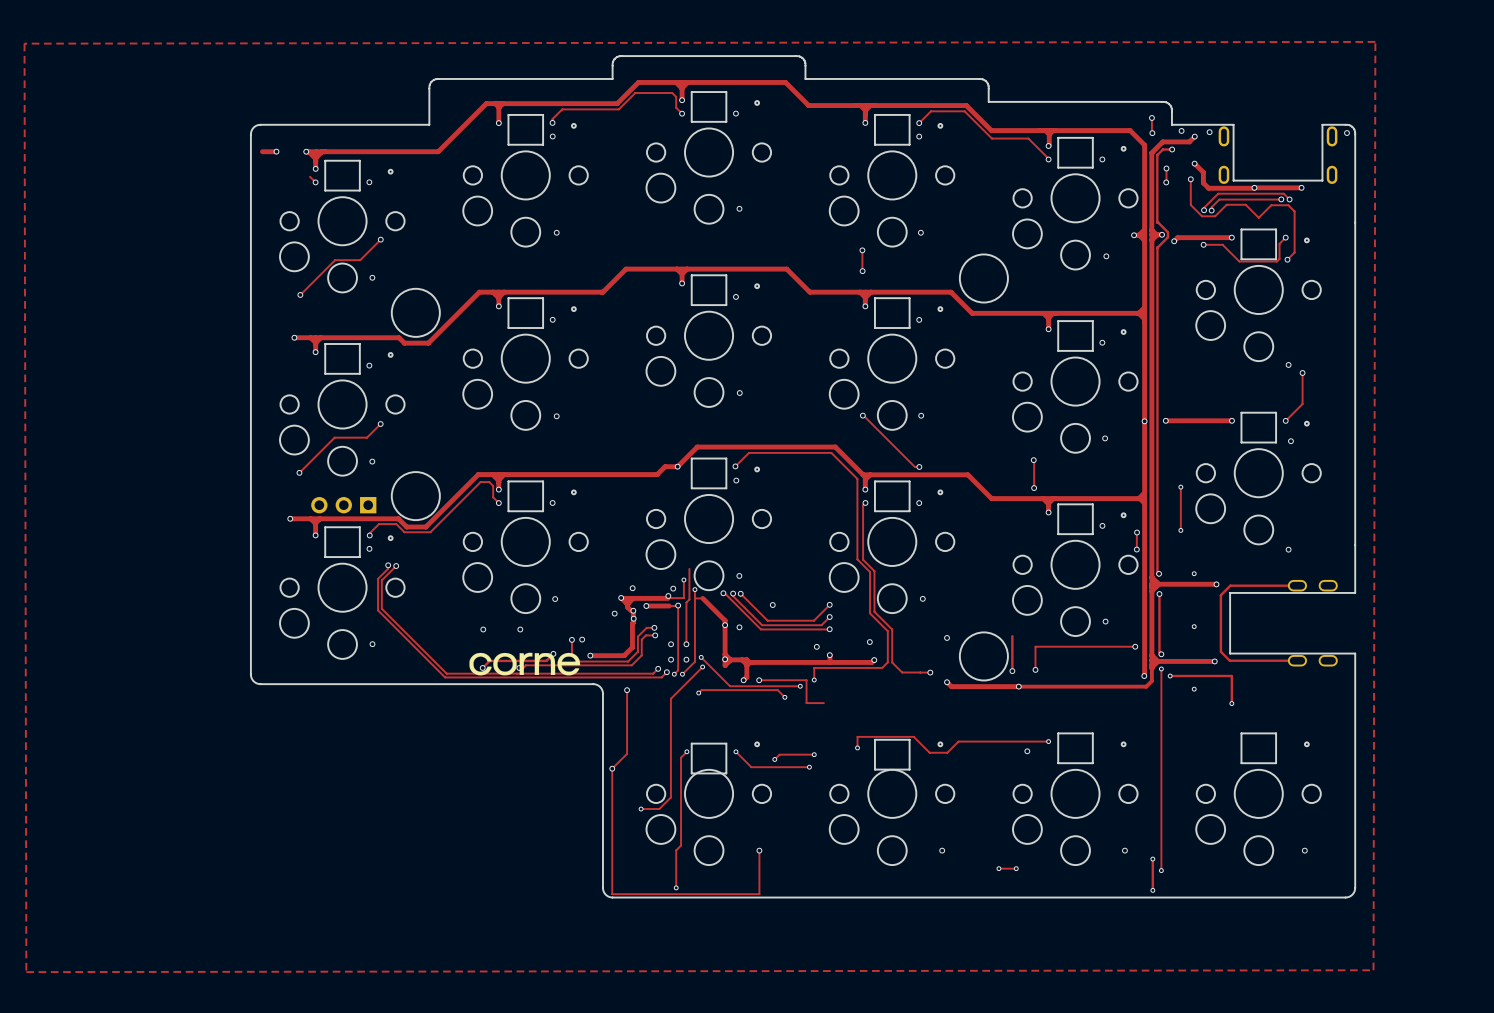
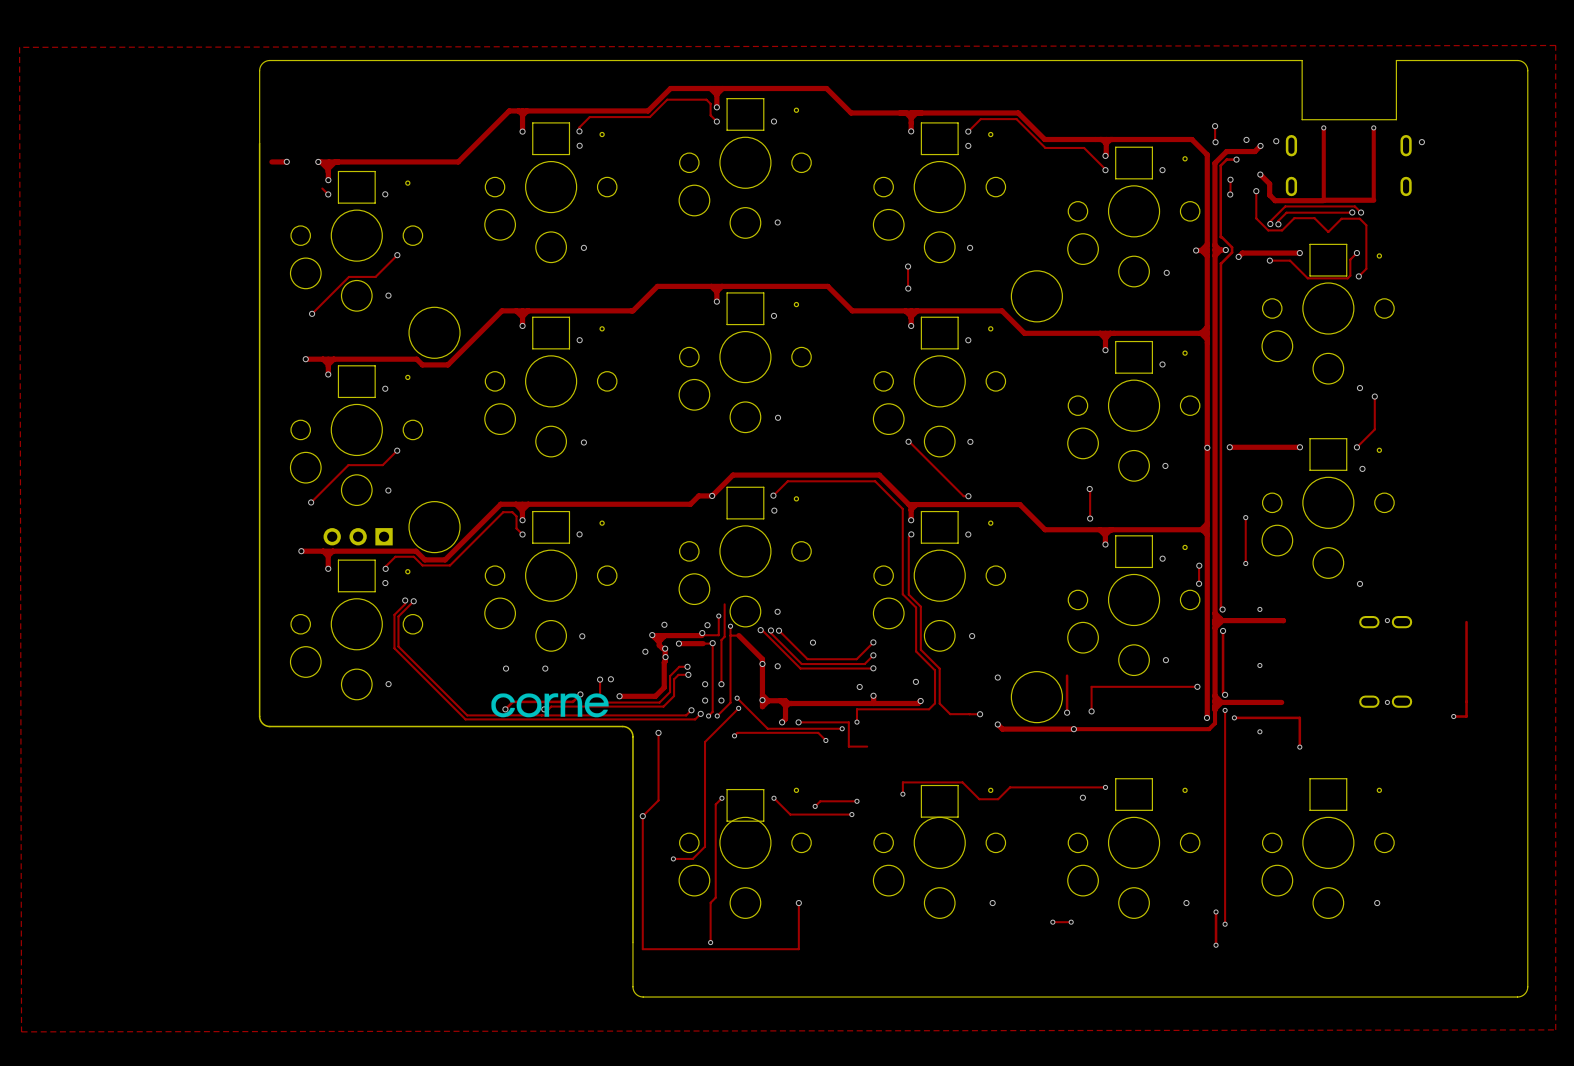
zone outline: (24, 43) (1375, 41) (1373, 970) (26, 972) -> (19, 47) (1555, 45) (1555, 1029) (21, 1031)
board edge: (622, 56) (616, 57) (613, 61) (612, 78) (434, 79) (429, 86) (429, 124) (260, 124) (253, 127) (250, 134) -> (653, 60) (267, 60) (261, 64) (259, 69) (259, 143)
board edge: (795, 56) (801, 57) (804, 61) (805, 78) (982, 79) (988, 85) (988, 101) (1165, 102) (1171, 108) (1171, 124) (1233, 124) (1233, 180) (1322, 180) (1322, 124) (1347, 124) (1353, 128) (1355, 592) (1230, 592) (1230, 653) (1355, 653) (1354, 890) (1351, 895) (1345, 897) (612, 897) (605, 894) (602, 887) -> (837, 60) (1302, 60) (1302, 119) (1396, 119) (1396, 60) (1517, 60) (1525, 64) (1527, 70) (1527, 989) (1523, 994) (1517, 997) (643, 997) (635, 994) (633, 988) (632, 942)
track: none -> (1323, 127) (1323, 200)
via: none -> (1323, 127)
track: none -> (1373, 127) (1373, 200)
via: none -> (1373, 127)
via: (1254, 187) -> none
via: (1301, 187) -> none
via: (1216, 584) -> none
via: none -> (1387, 620)
track: (1297, 585) (1230, 585) (1220, 595) (1220, 651) (1229, 660) (1297, 660) -> none
track: none -> (1466, 622) (1466, 716) (1453, 716)
via: (1214, 661) -> none
via: none -> (1387, 702)
via: none -> (1453, 716)

